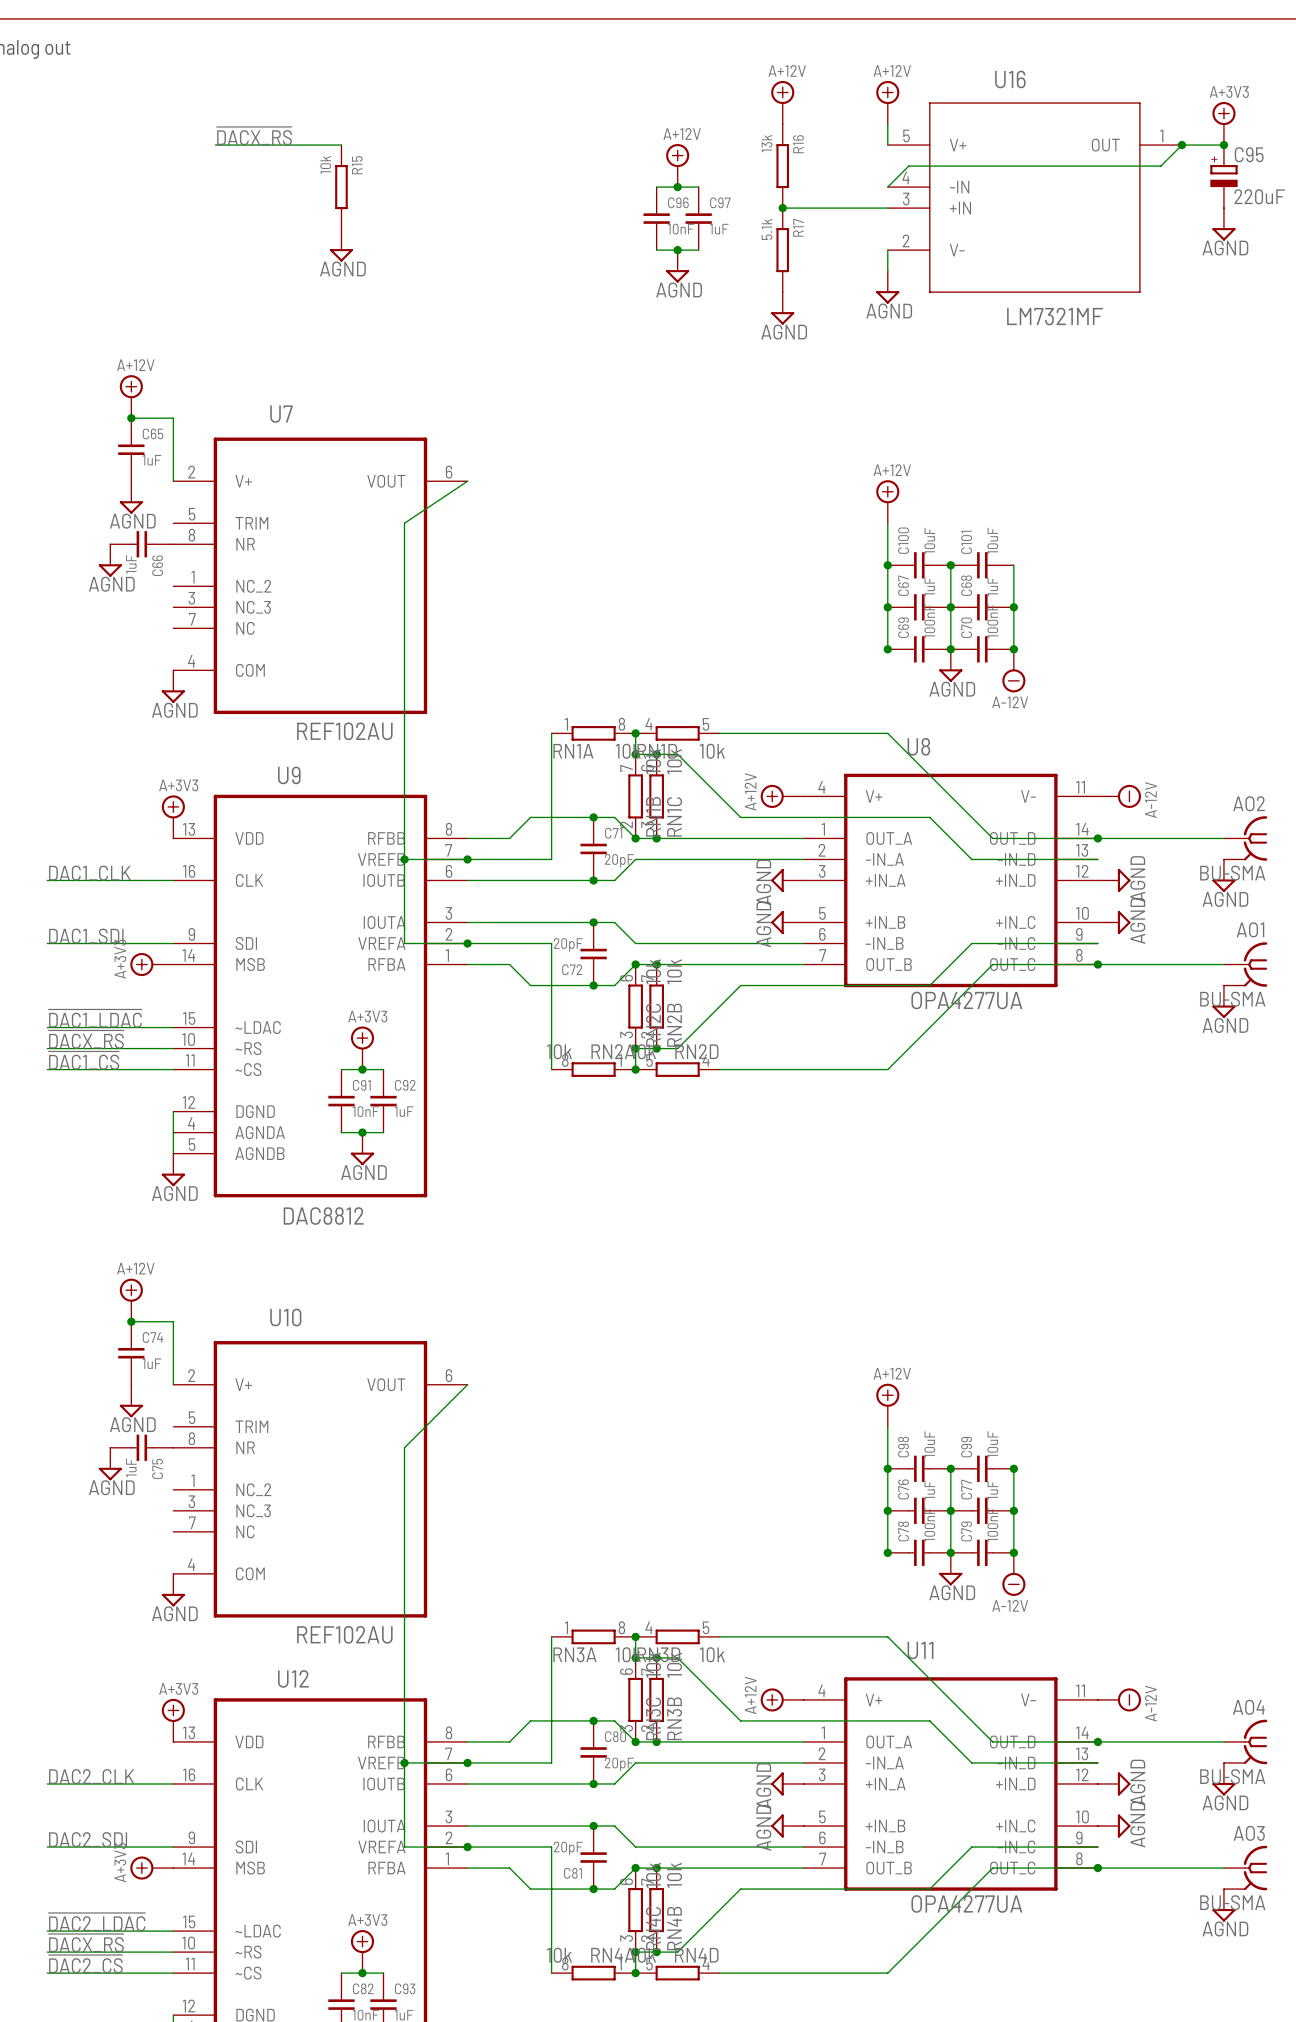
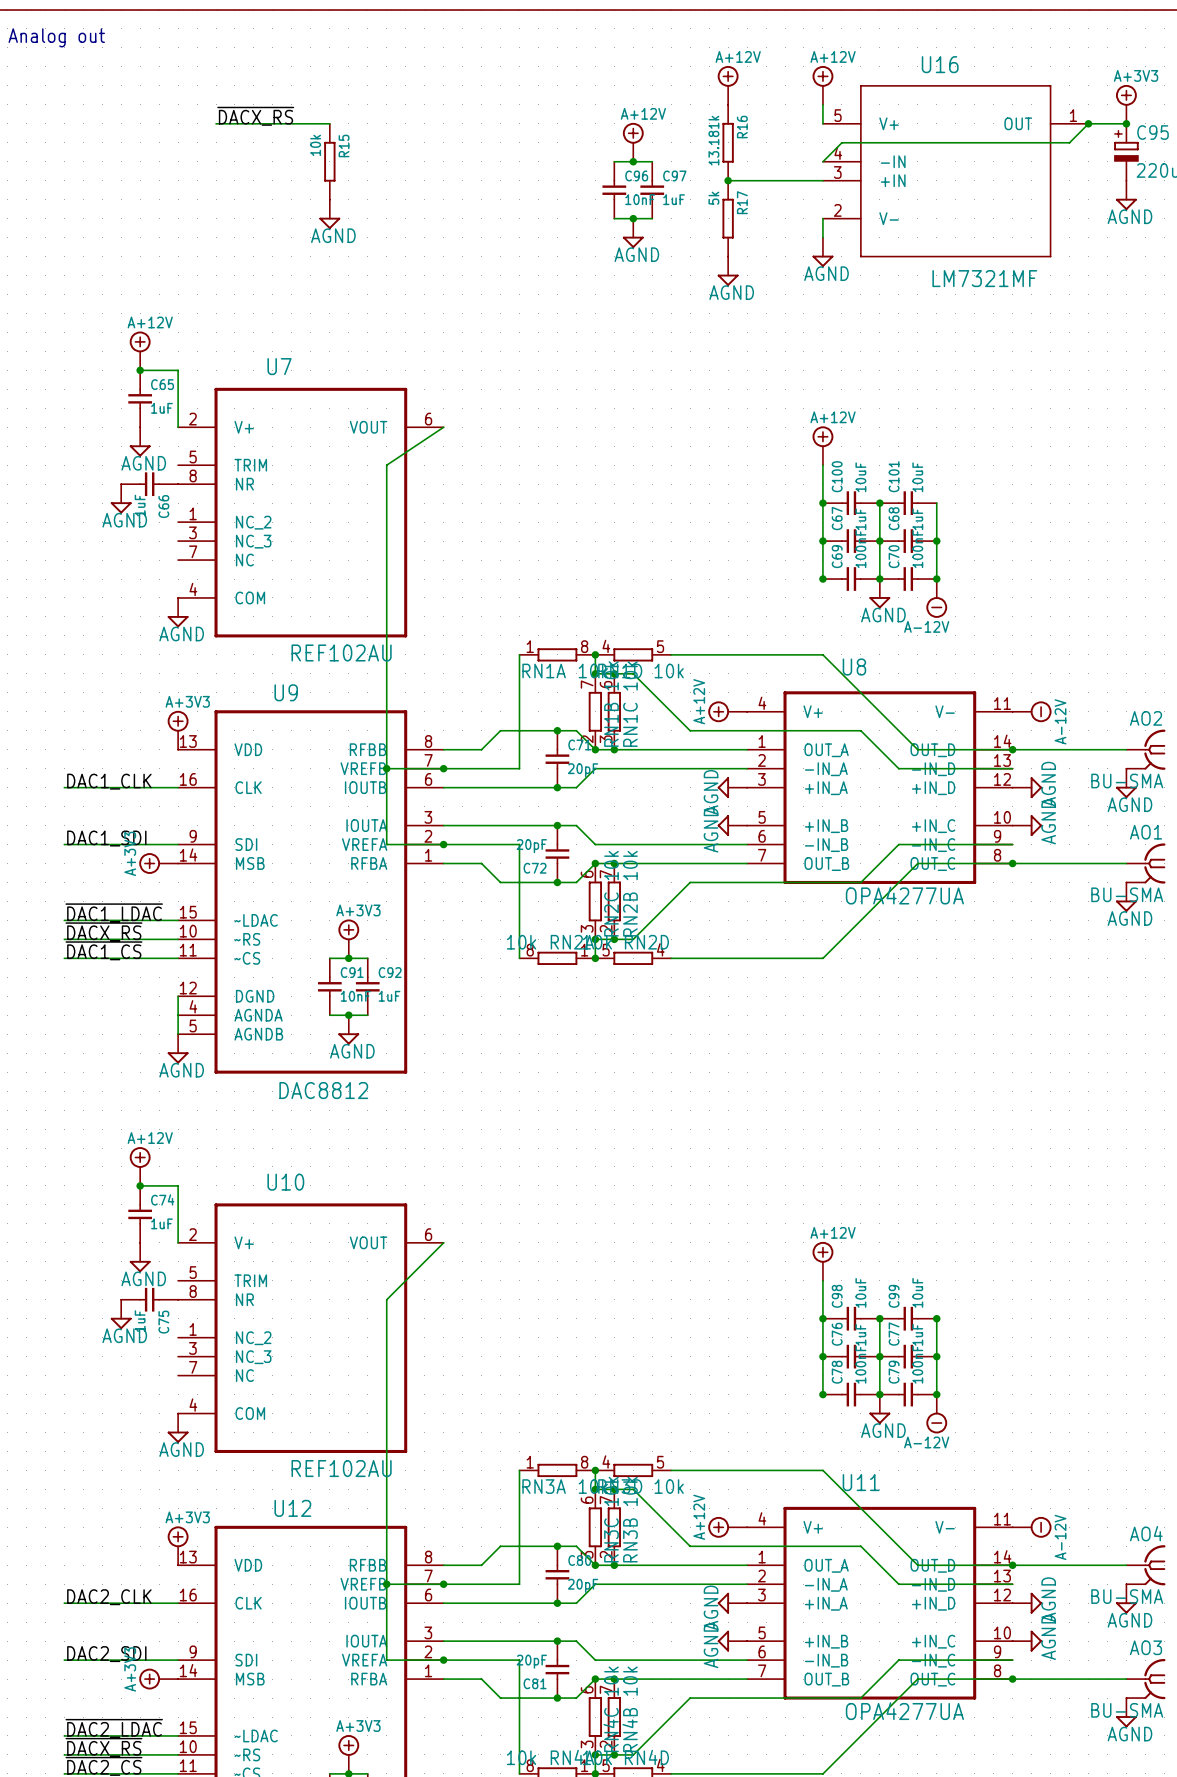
R16 value: 13k (767, 143) -> 13.181k (713, 140)
R17 value: 5.1k (767, 229) -> 5k (713, 198)

